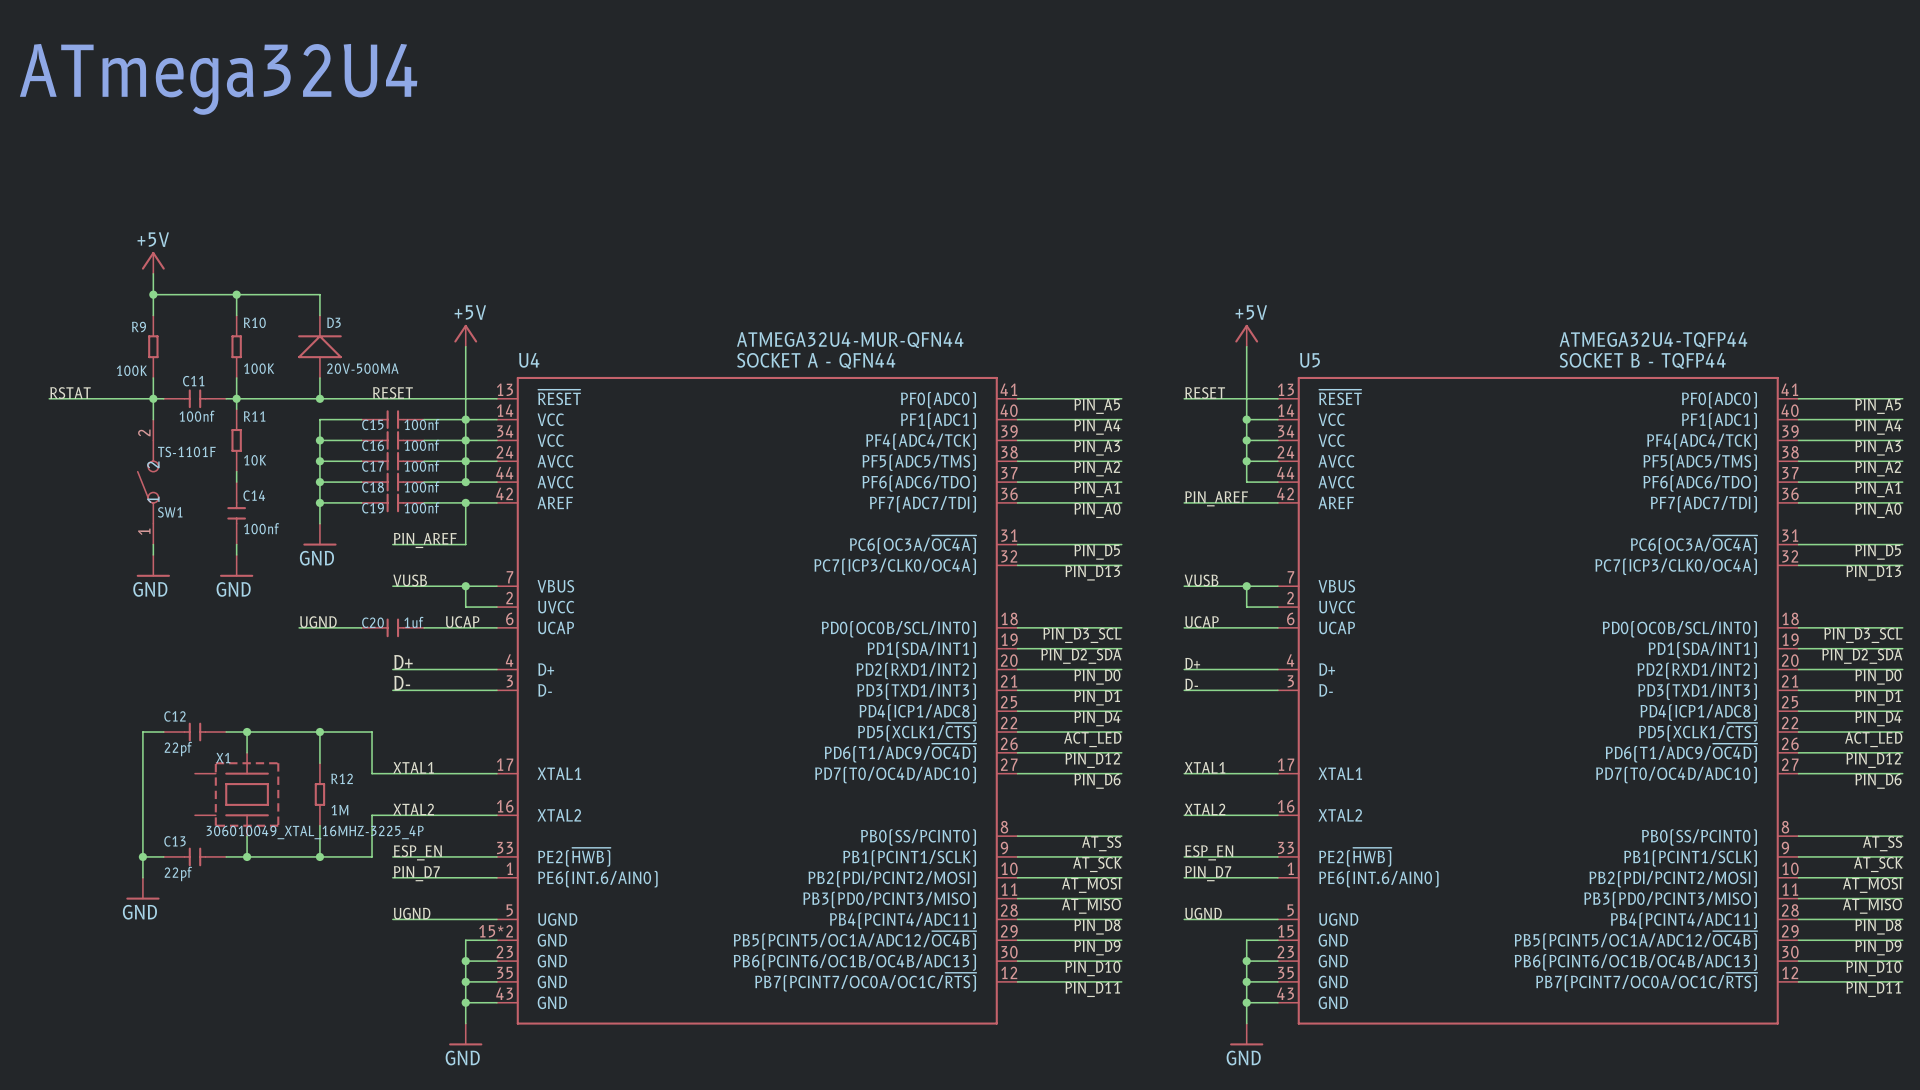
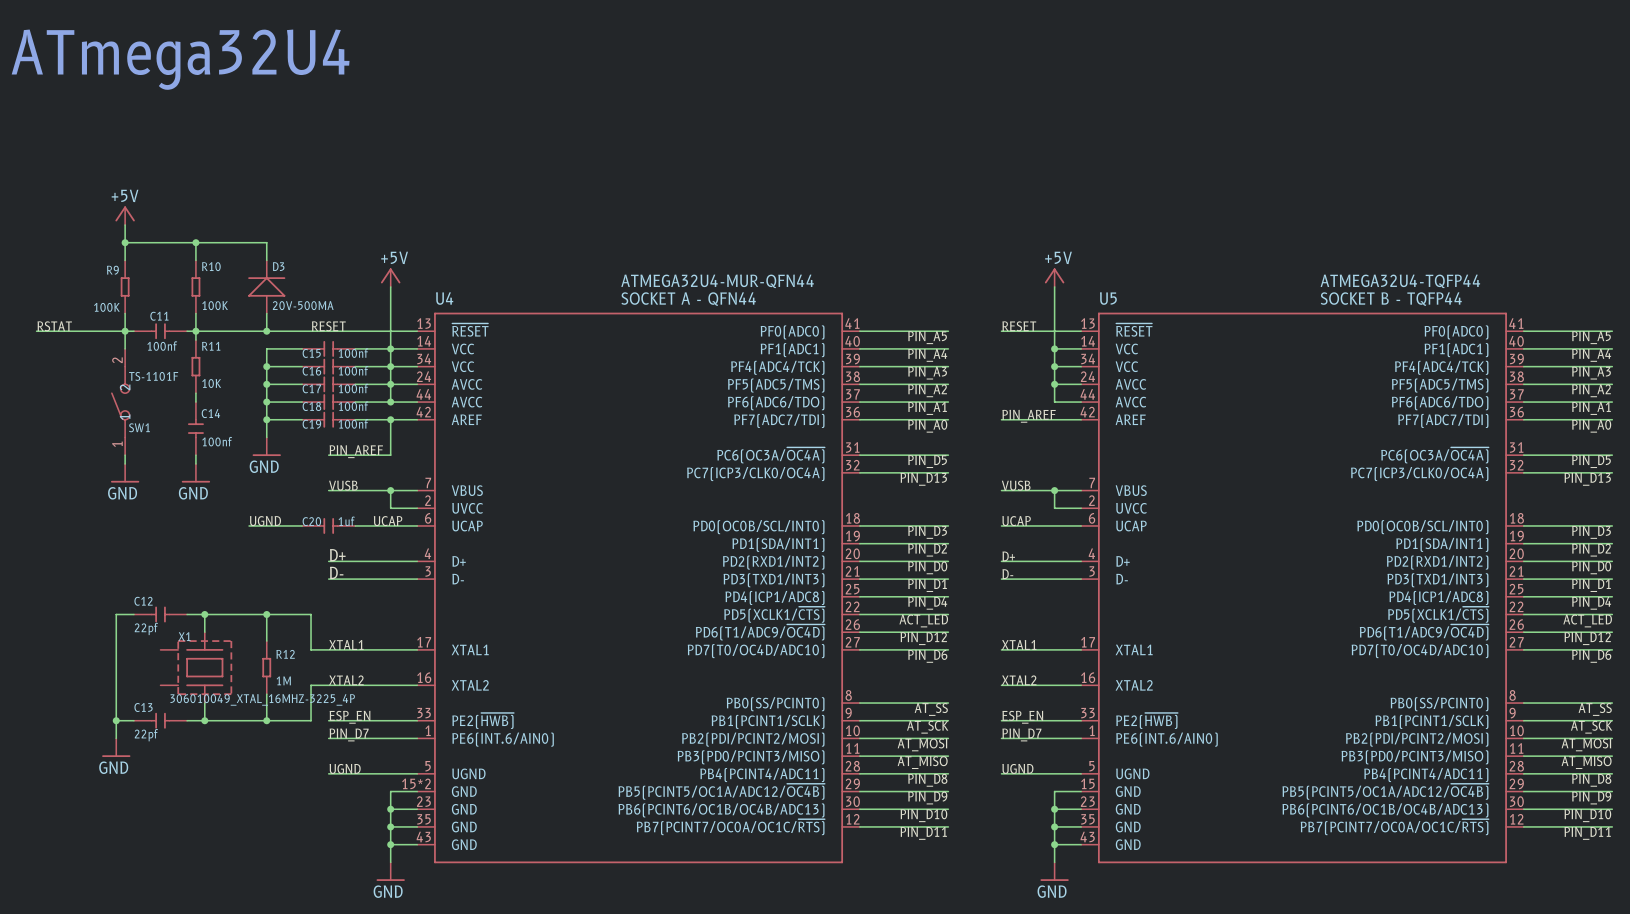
label: PIN_D3_SCL (1082, 635) -> PIN_D3 (927, 532)
label: PIN_D3_SCL (1863, 635) -> PIN_D3 (1591, 532)
label: PIN_D2_SDA (1081, 656) -> PIN_D2 (927, 550)
label: PIN_D2_SDA (1862, 656) -> PIN_D2 (1591, 550)

